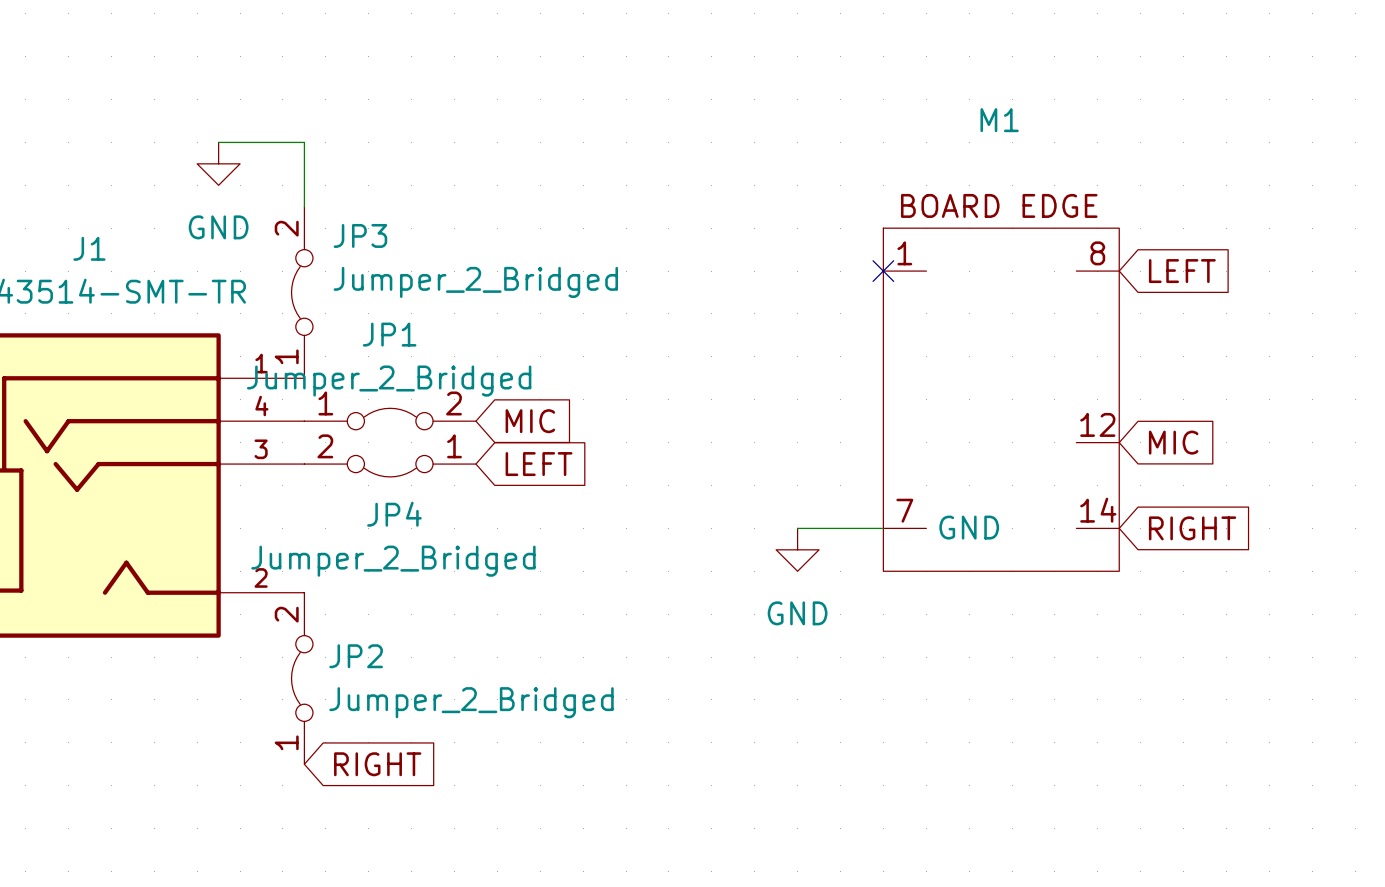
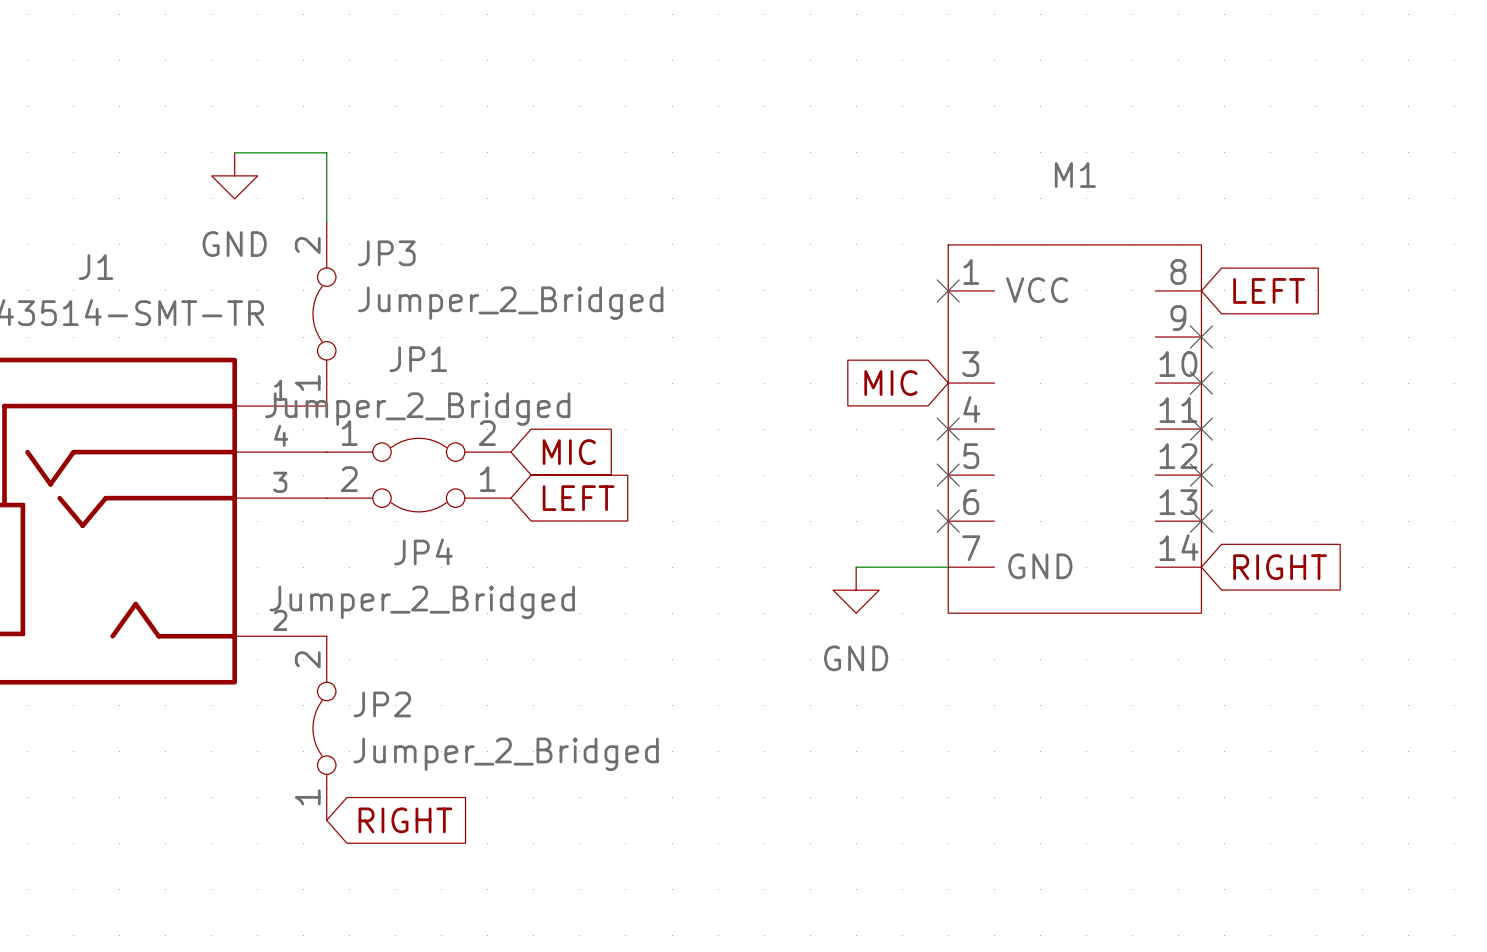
M1 name position: M1 (999, 120) -> M1 (1075, 175)
M1 symbol: [883, 228, 1120, 572] -> [948, 244, 1202, 614]
no-connect mark: none -> (1201, 337)
no-connect mark: none -> (1201, 383)
no-connect mark: none -> (948, 429)
no-connect mark: none -> (1201, 429)
no-connect mark: none -> (948, 475)
no-connect mark: none -> (1201, 475)
global label rotation: 0° (1173, 442) -> 180° (890, 383)
global label position: MIC (1173, 442) -> MIC (890, 383)
no-connect mark: none -> (948, 521)
no-connect mark: none -> (1201, 521)

